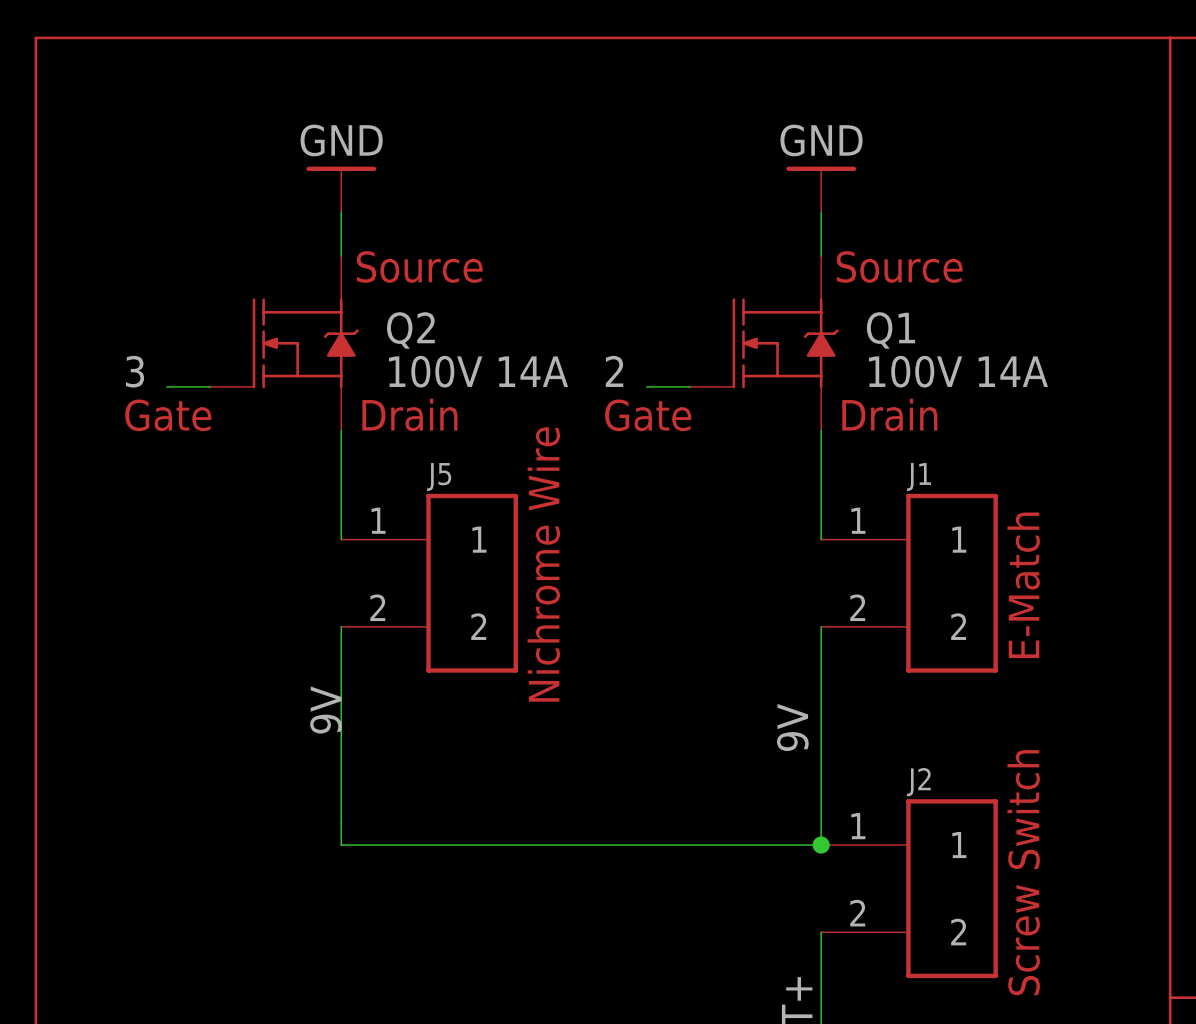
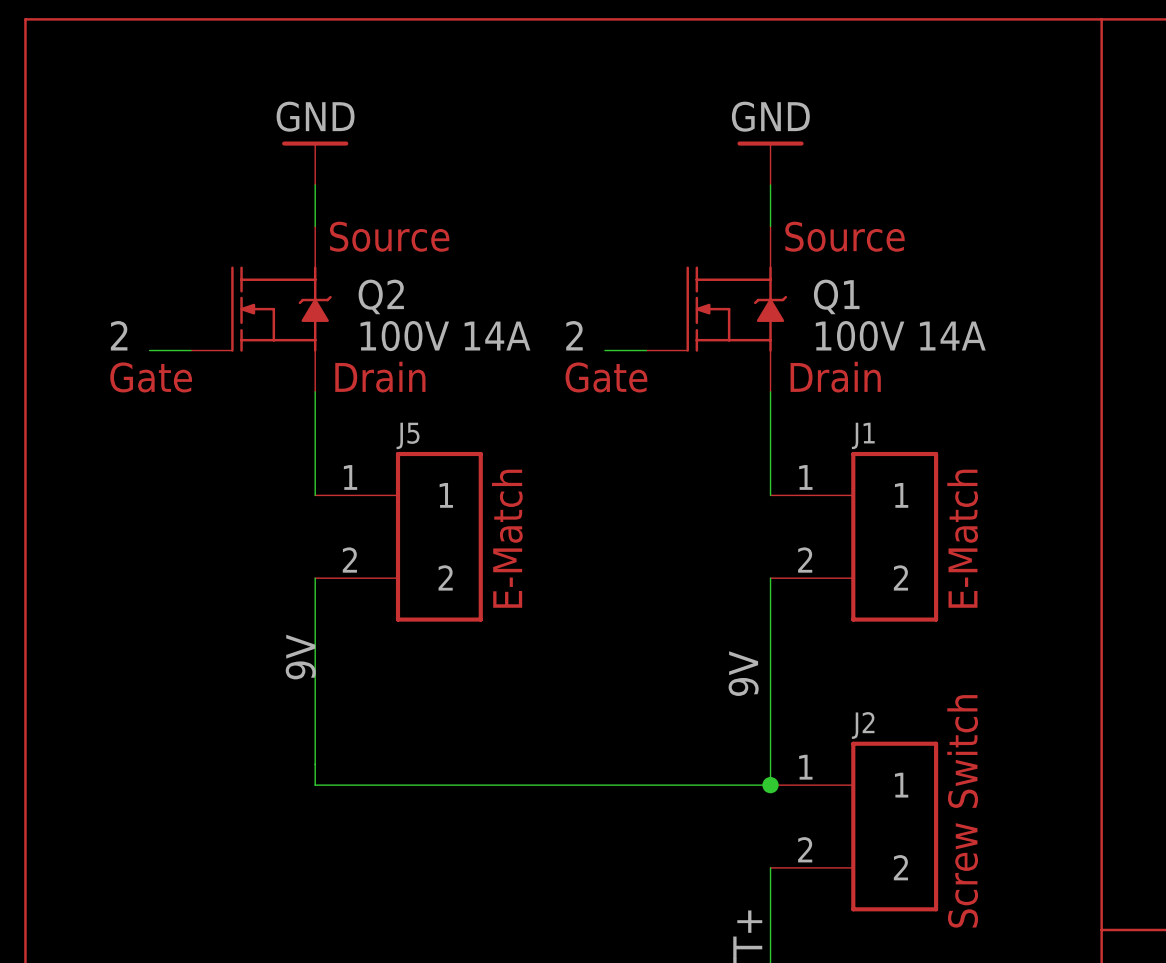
label: 3 (135, 371) -> 2 (119, 335)
text: Nichrome Wire (543, 564) -> none
text: none -> E-Match (507, 538)

